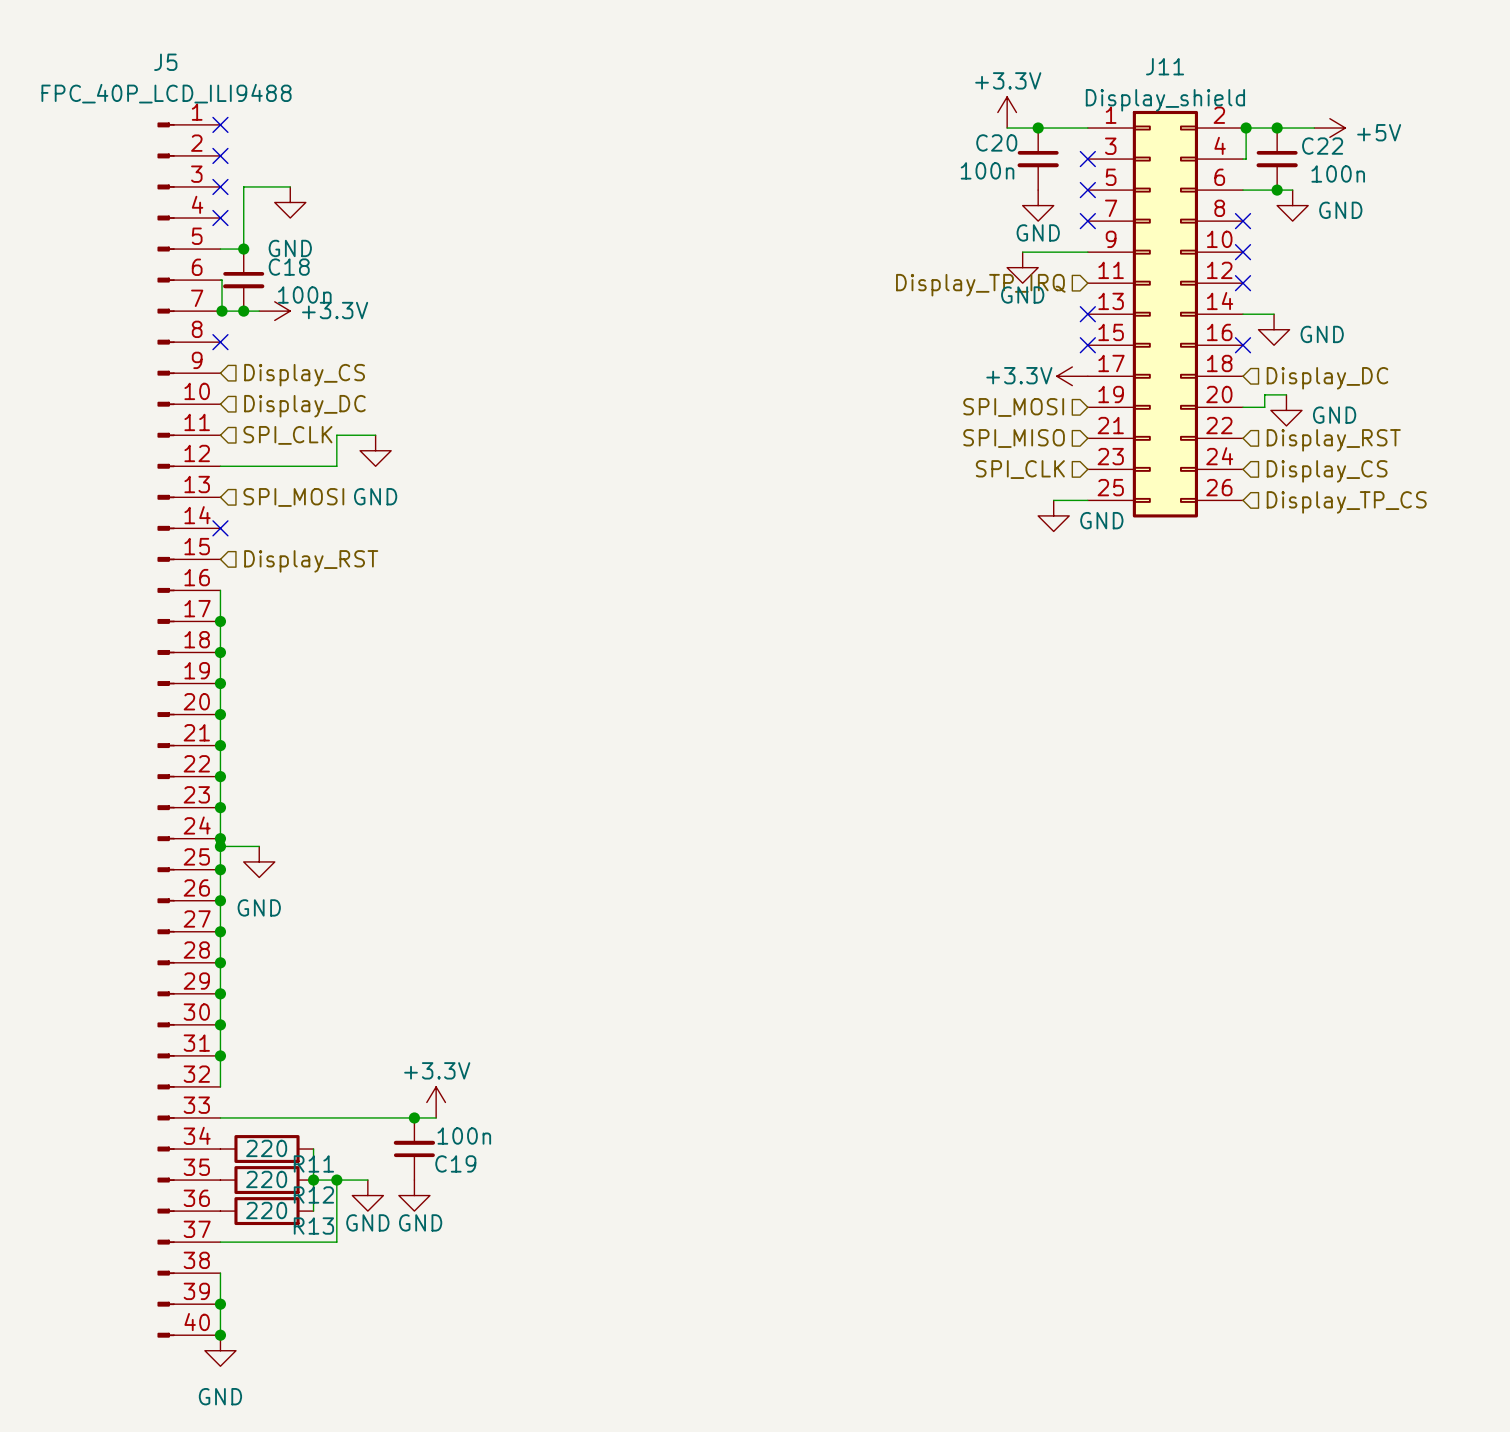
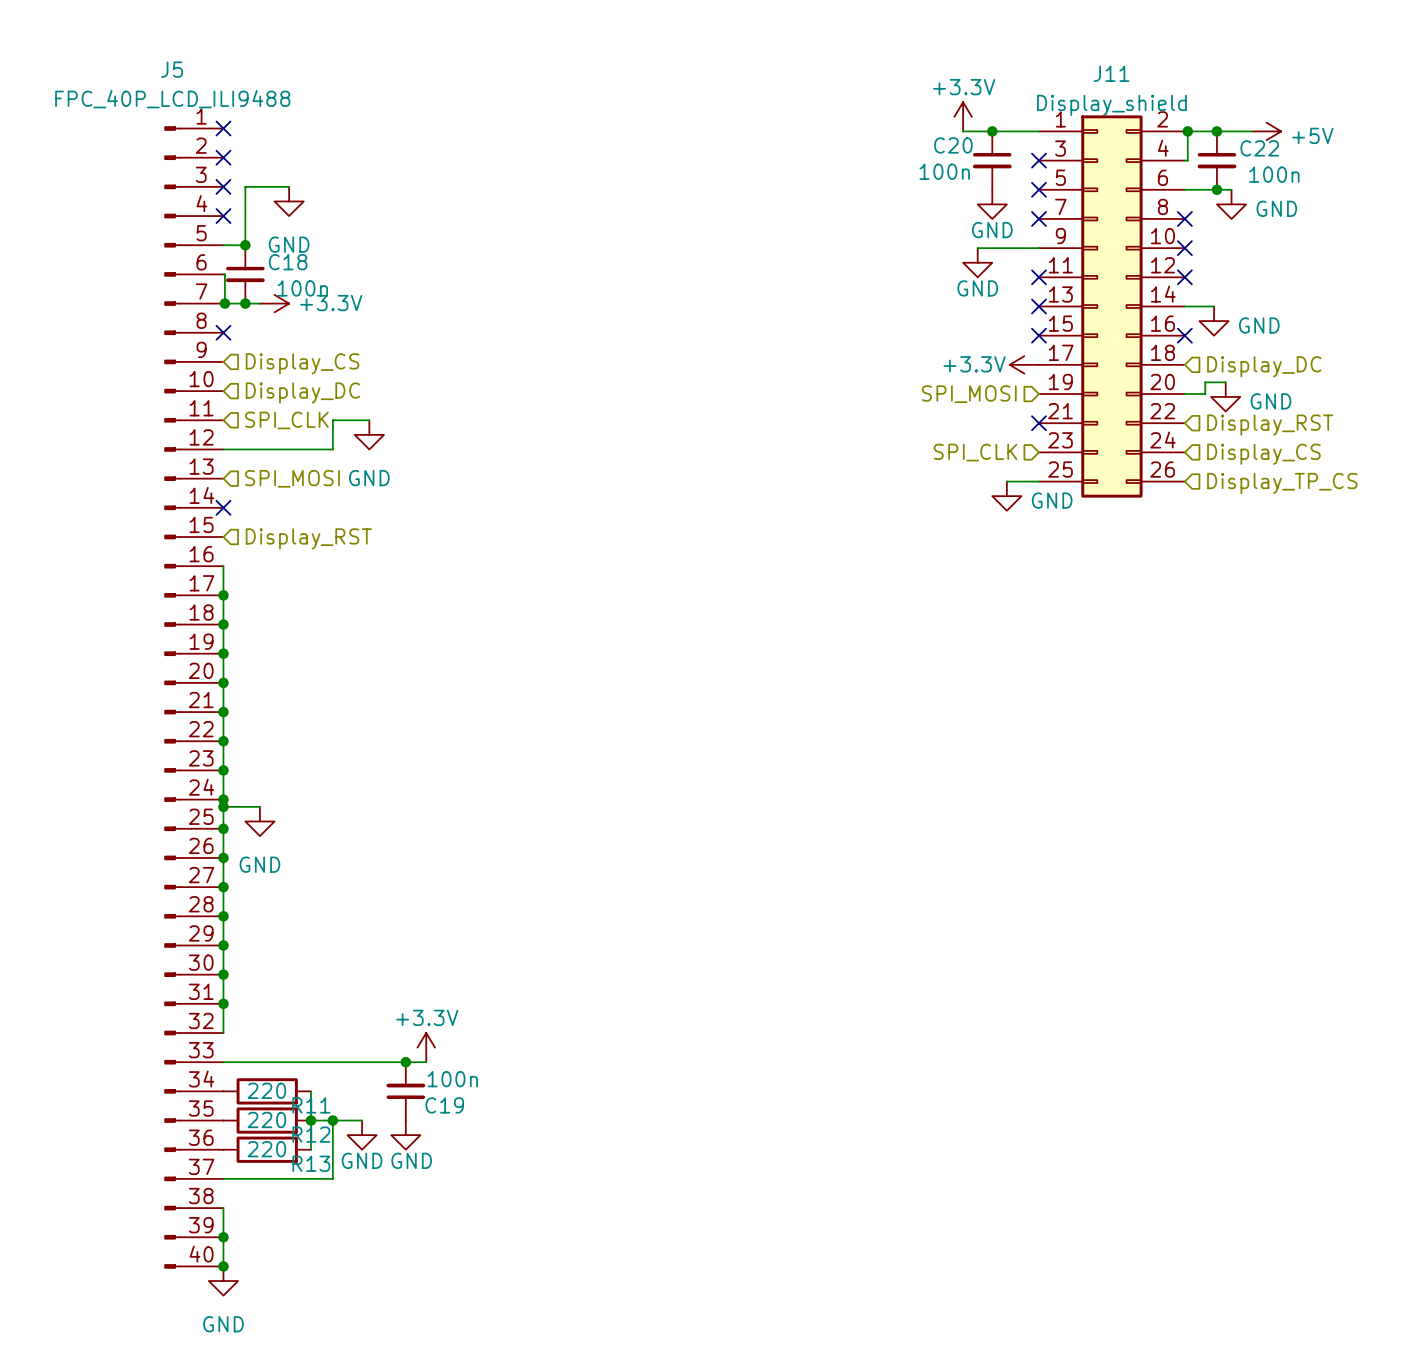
no-connect mark: none -> (1038, 277)
hierarchical label: Display_TP_IRQ (980, 285) -> none
hierarchical label: SPI_MISO (1014, 438) -> none
no-connect mark: none -> (1038, 423)

